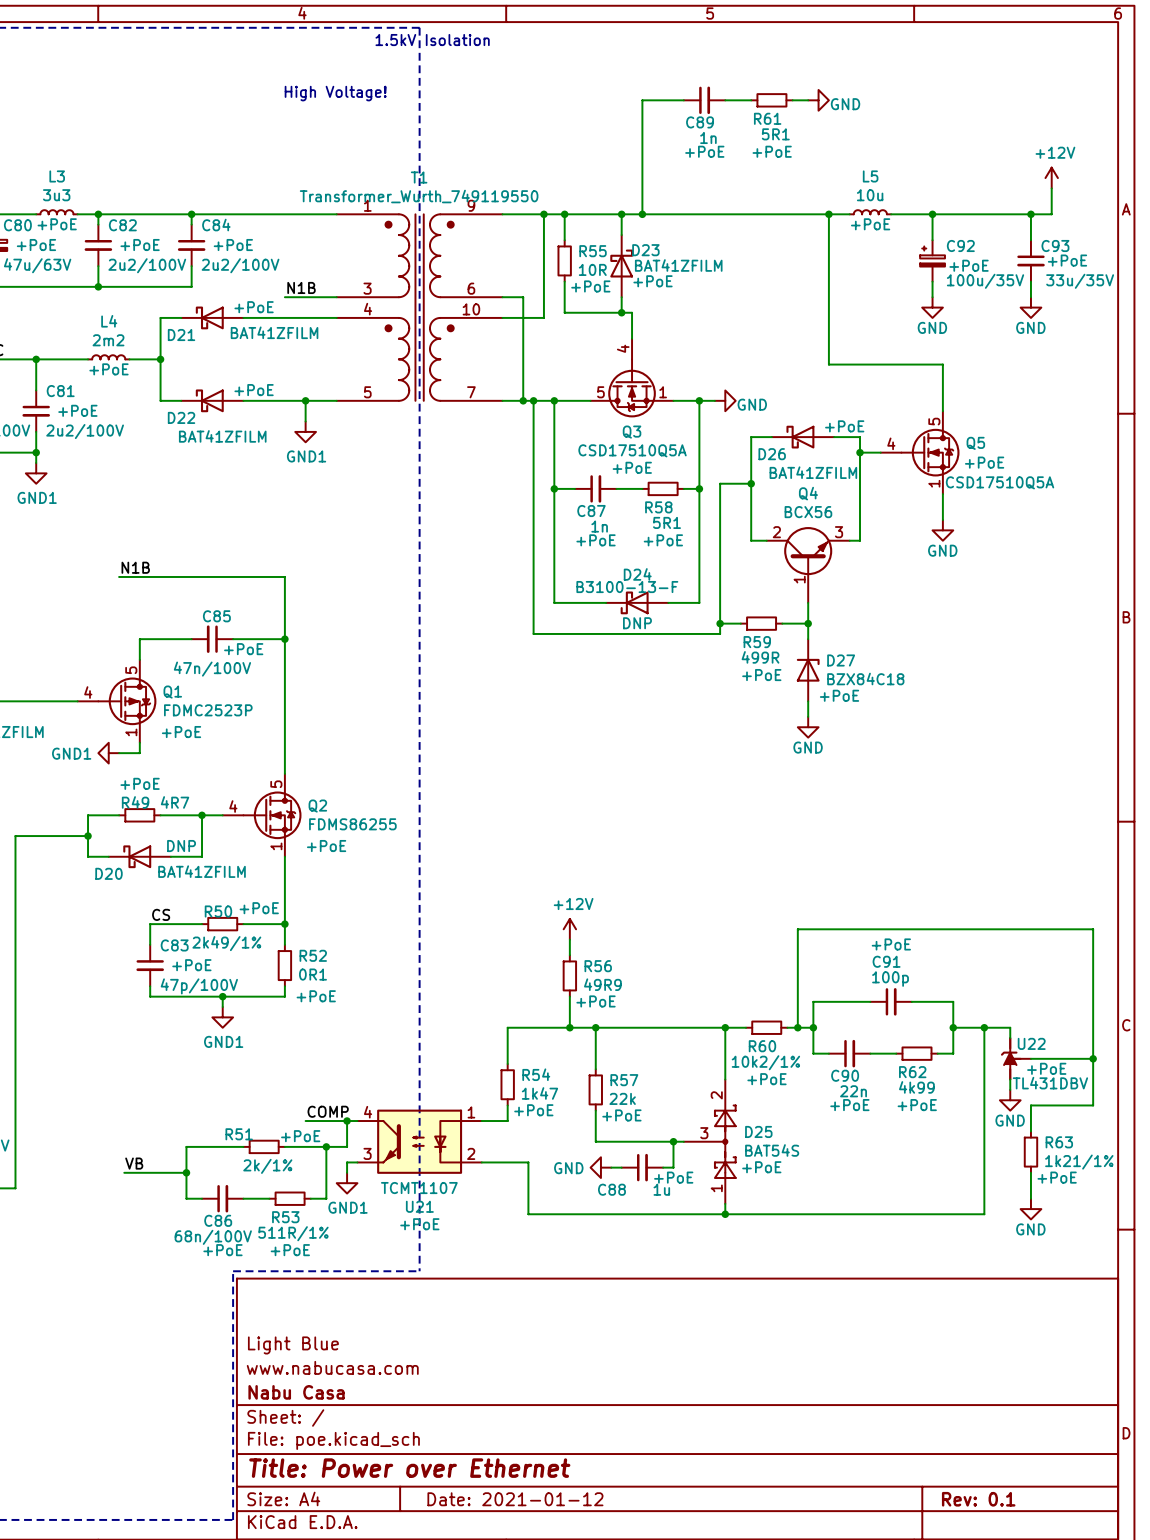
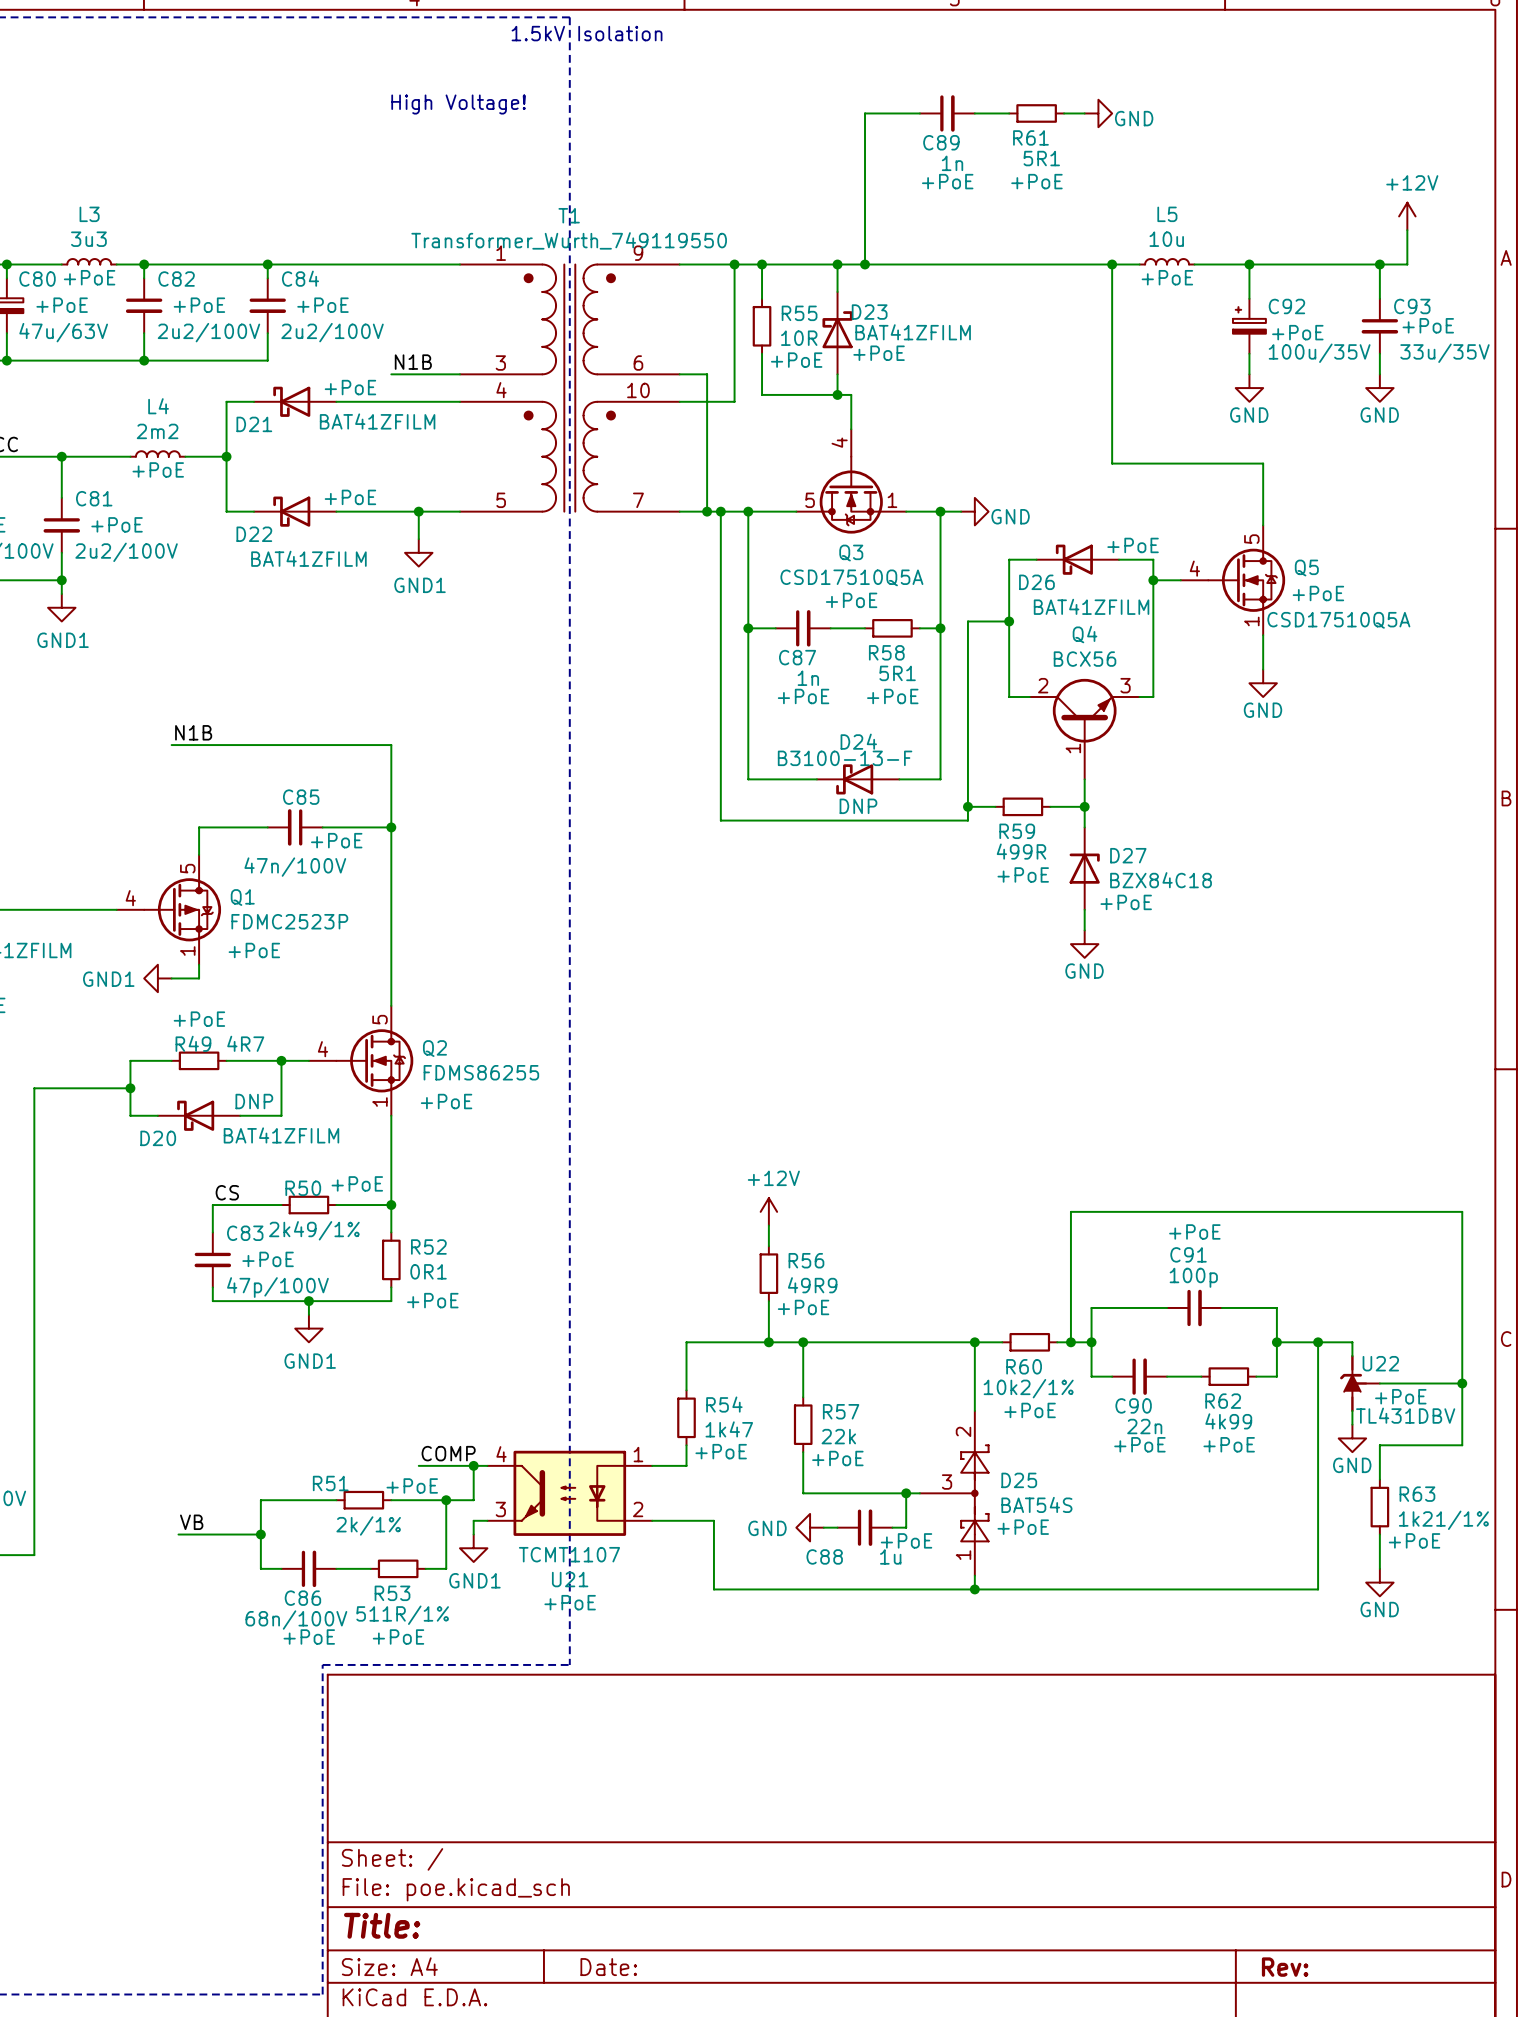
title block: Light Blue (293, 1345) -> none
title block: www.nabucasa.com (332, 1367) -> none
title block: Nabu Casa (296, 1392) -> none
title block: Title: Power over Ethernet (409, 1468) -> Title: (382, 1925)
title block: Date: 2021-01-12 (515, 1499) -> Date: (608, 1967)
title block: Rev: 0.1 (978, 1499) -> Rev: (1285, 1967)

